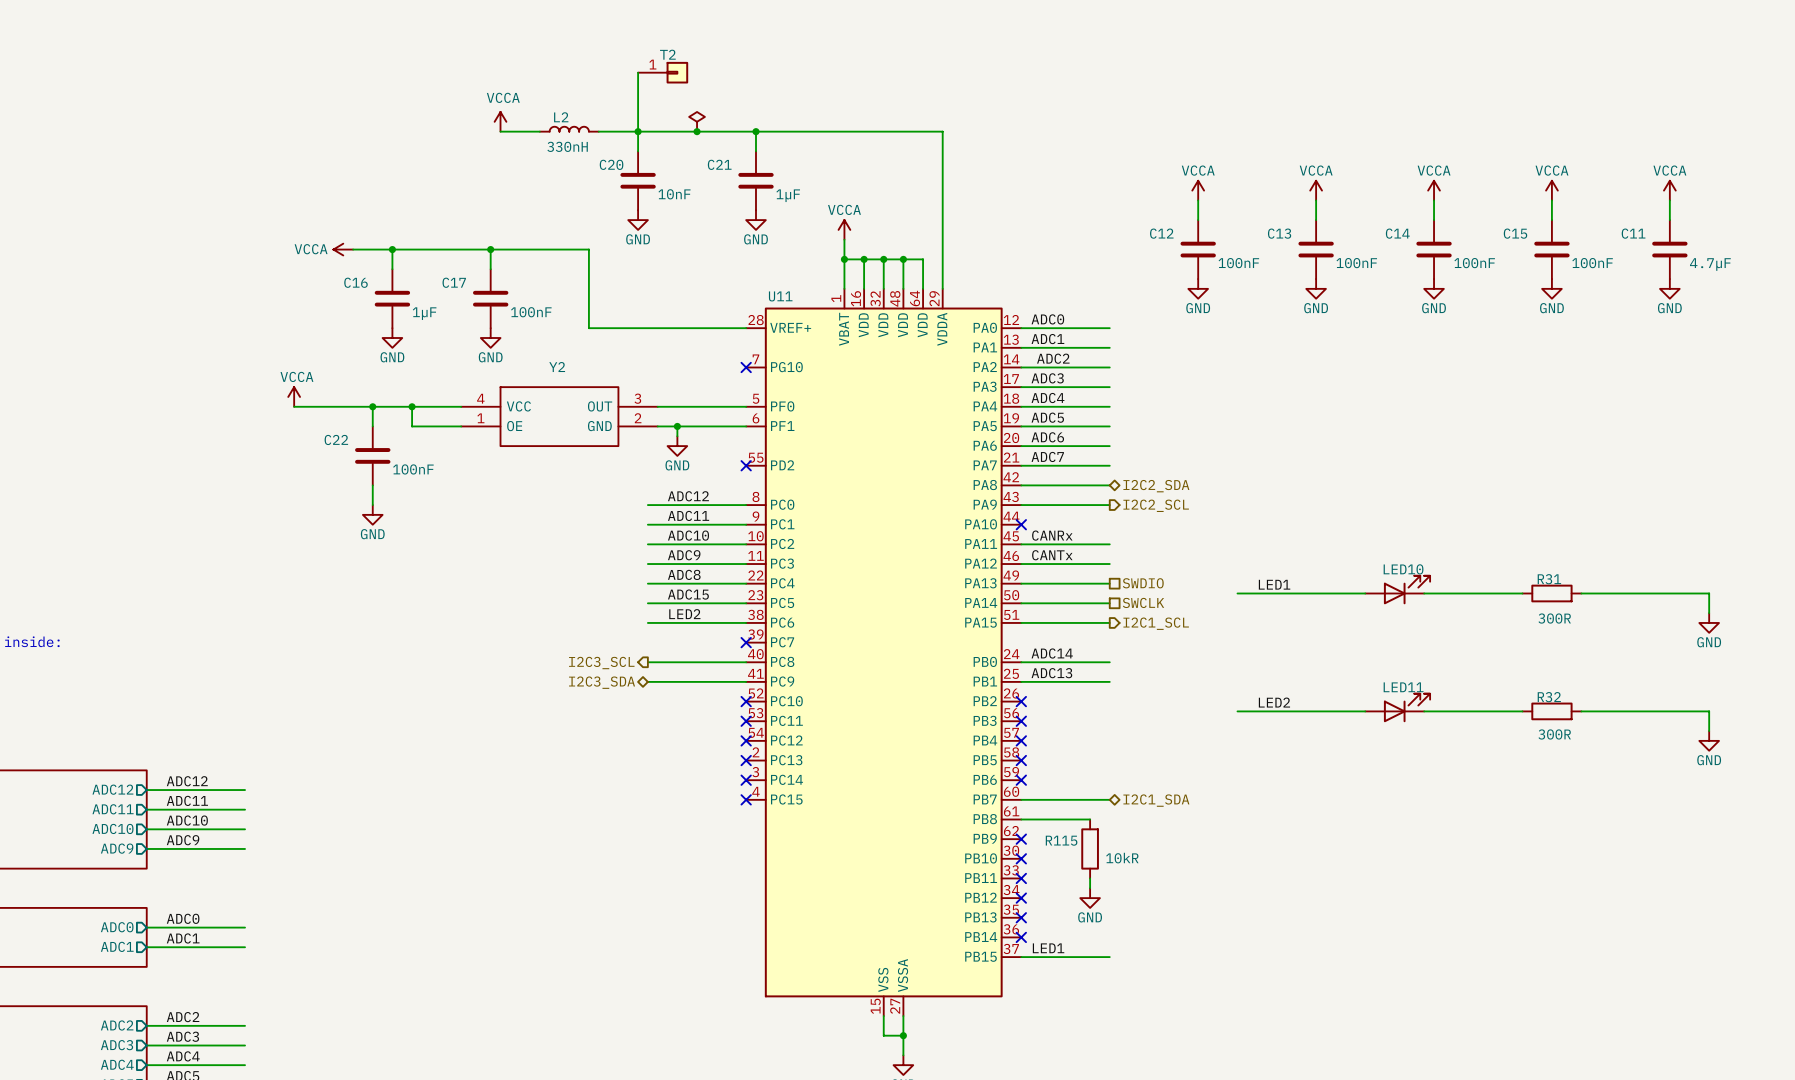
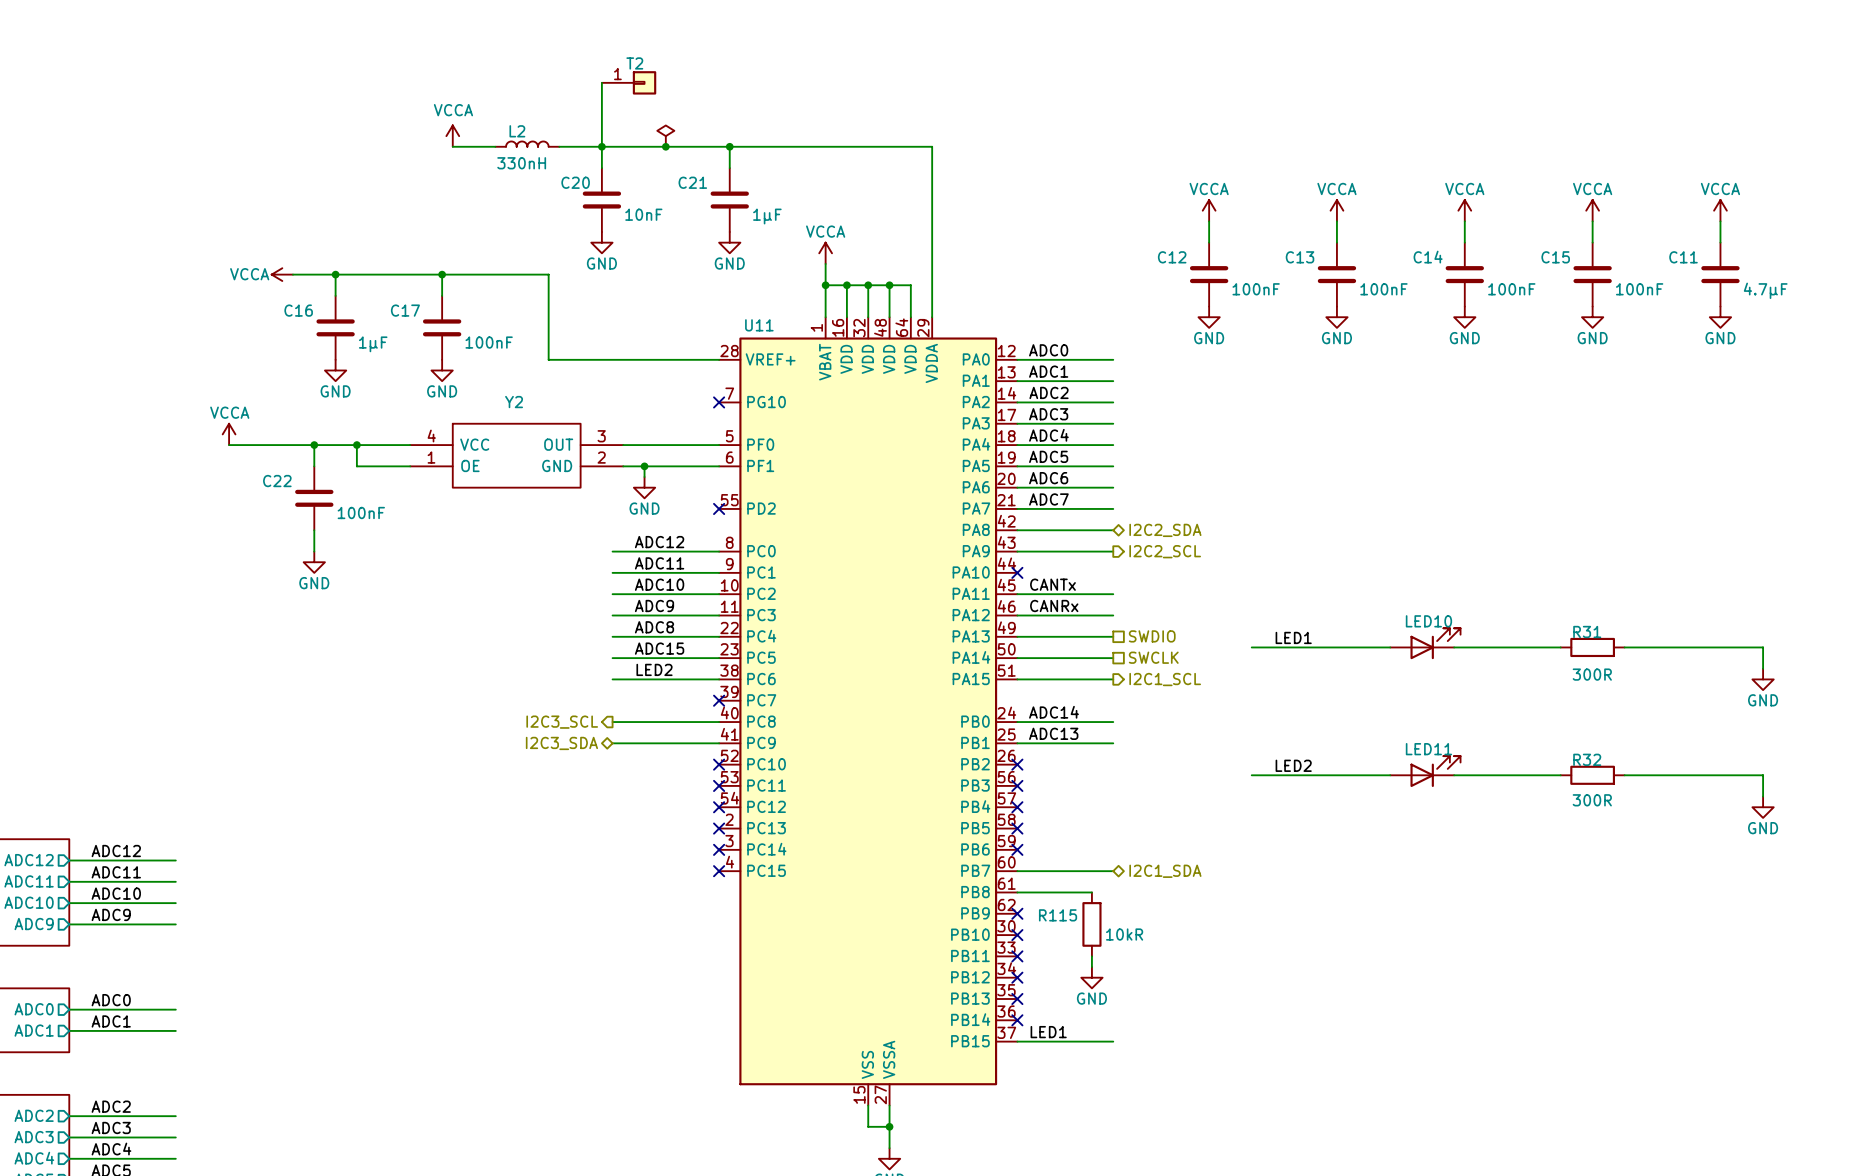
label: CANRx (1052, 535) -> CANTx (1052, 584)
label: CANTx (1052, 555) -> CANRx (1054, 605)

